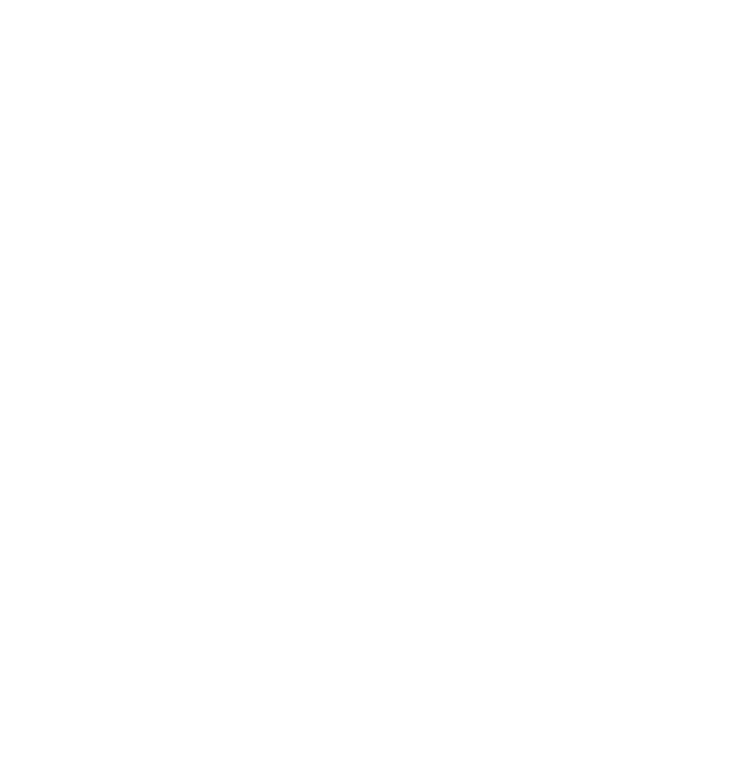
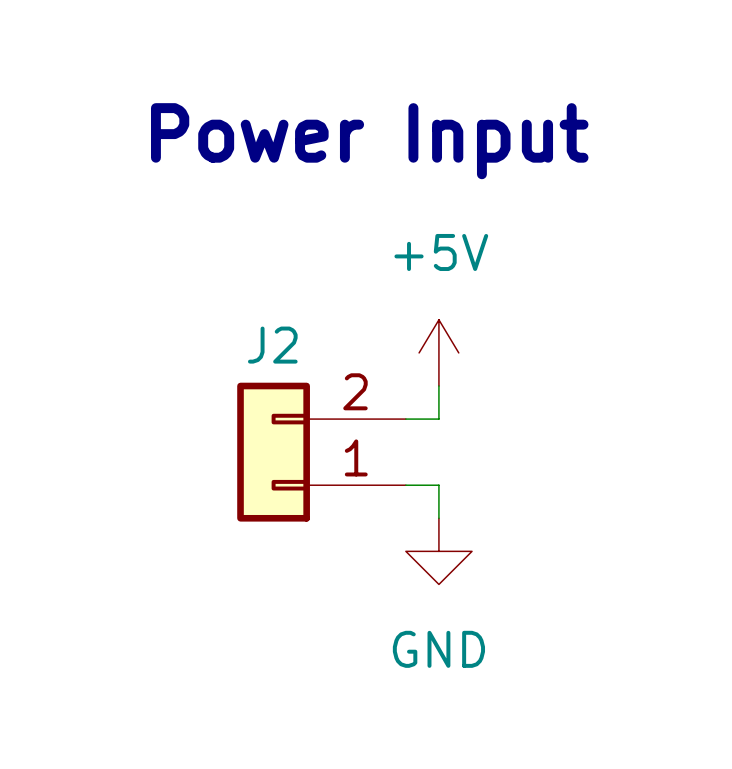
text: none -> Power Input (369, 141)
power symbol: none -> +5V (438, 352)
wire: none -> (438, 386) (438, 419) (405, 419)
J2: none -> (321, 452)
wire: none -> (405, 485) (438, 485) (438, 518)
power symbol: none -> GND (438, 551)

